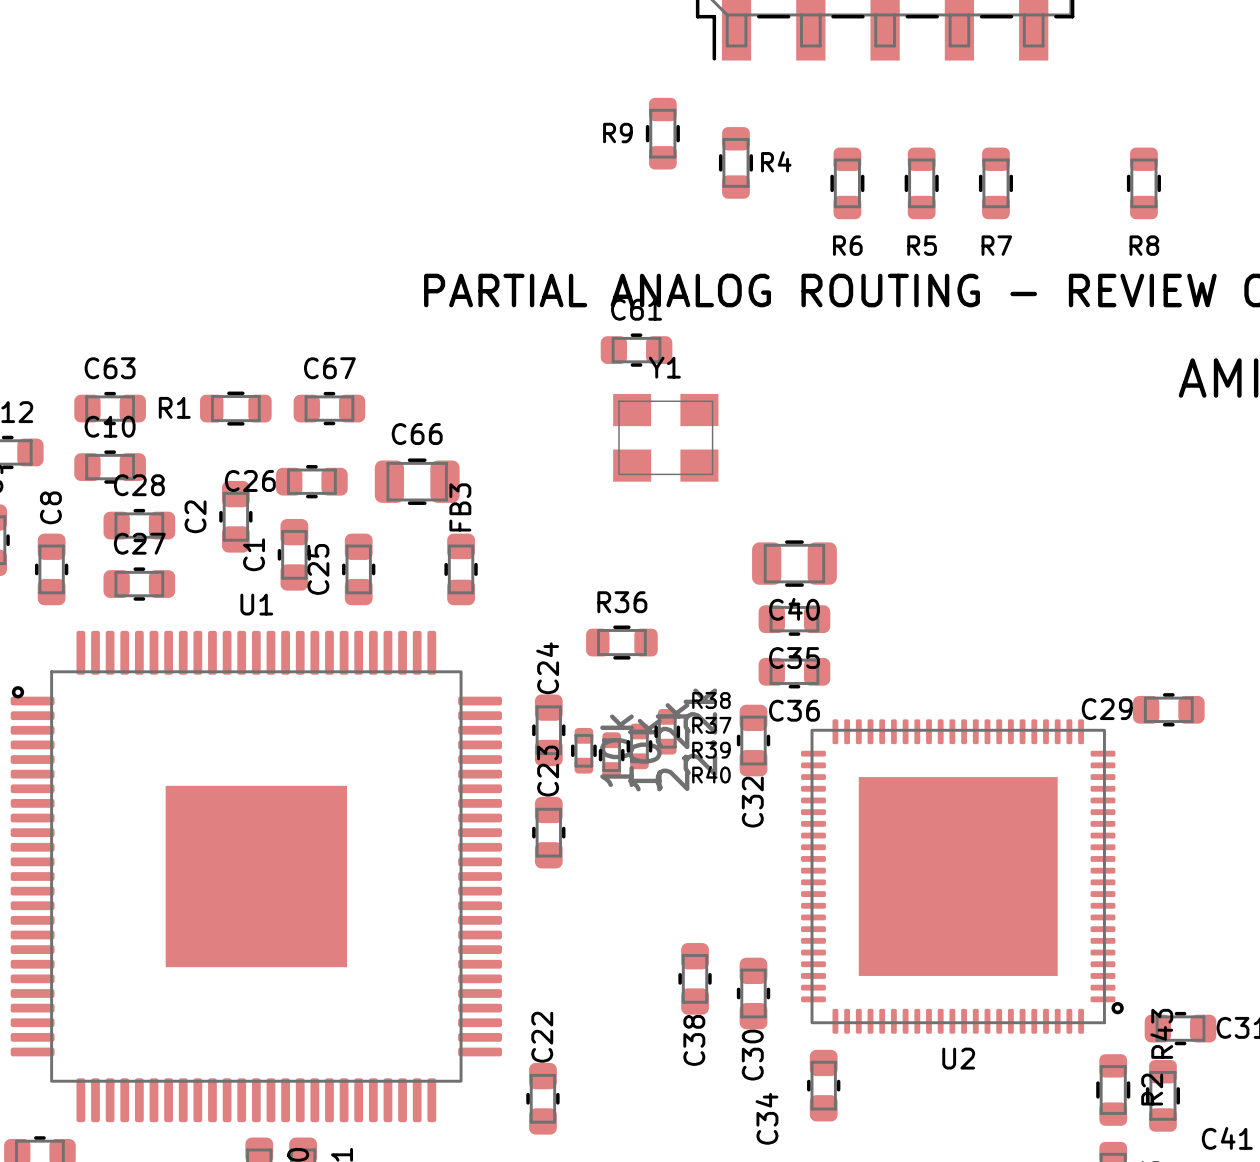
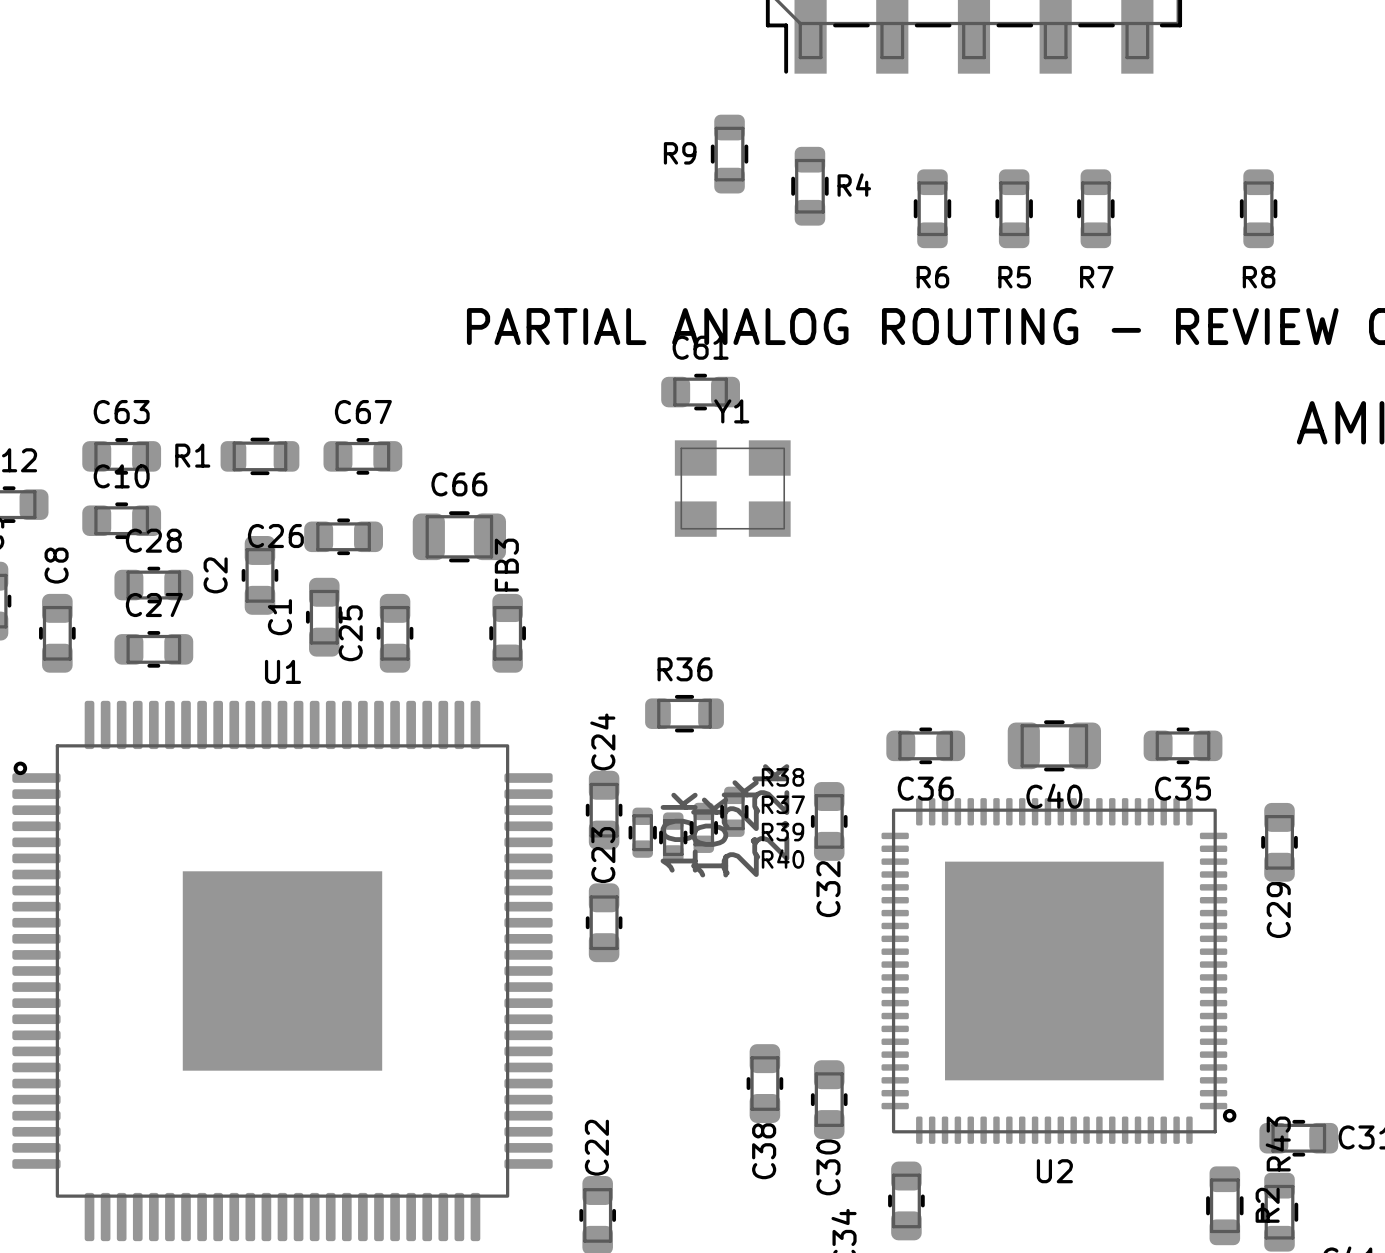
C40 position: (794, 563) -> (1054, 745)
C35 position: (794, 619) -> (1183, 745)
C36 position: (794, 671) -> (925, 745)
C29 name position: C29 (1107, 709) -> C29 (1278, 910)
C29 rotation: 0° (1168, 709) -> 90° clockwise (1279, 842)
C29 position: (1168, 709) -> (1279, 842)

